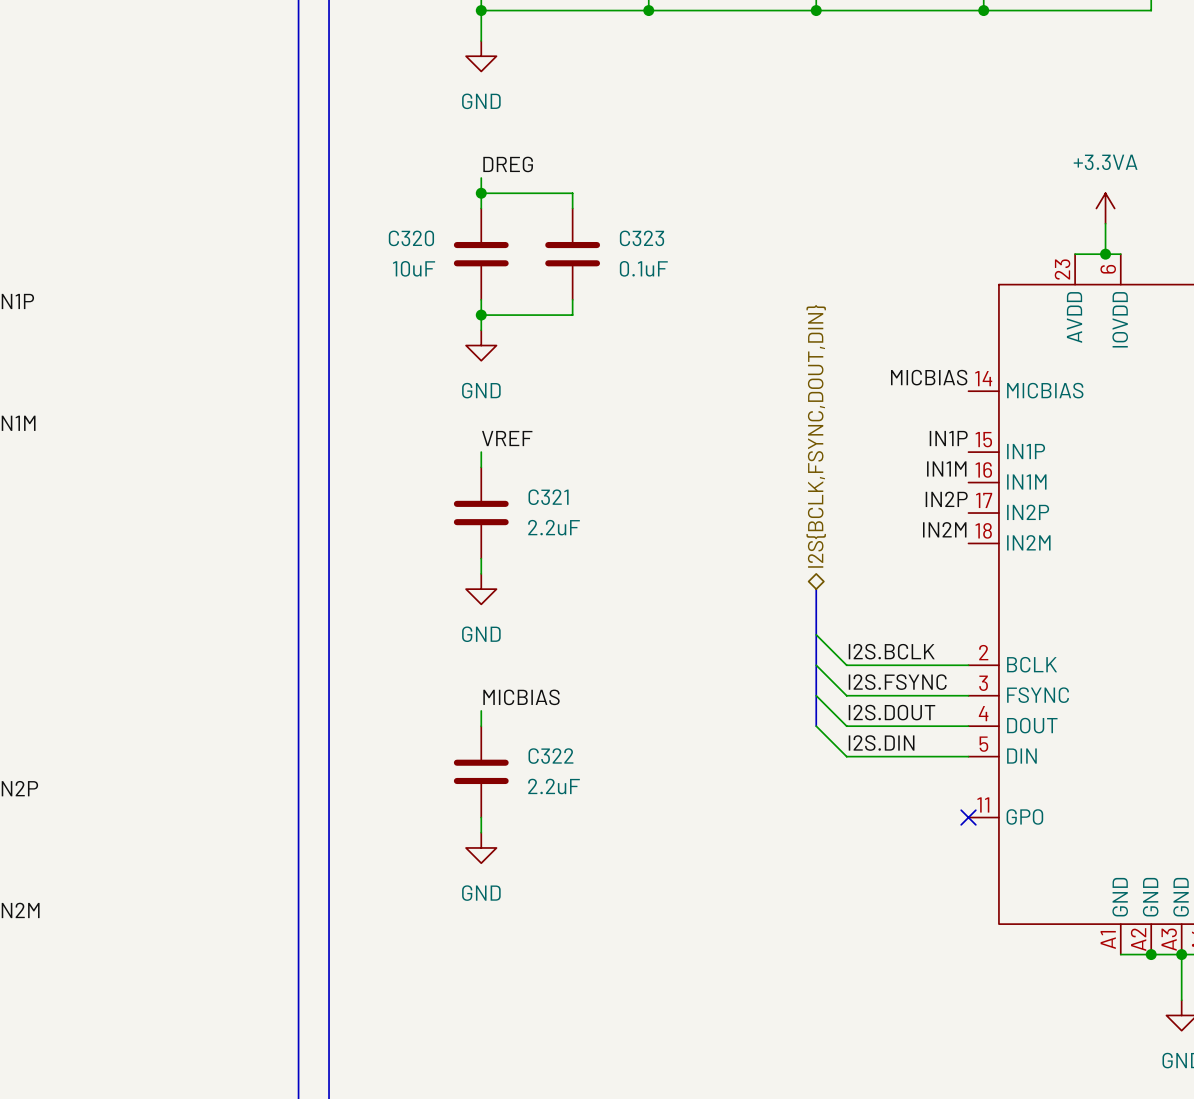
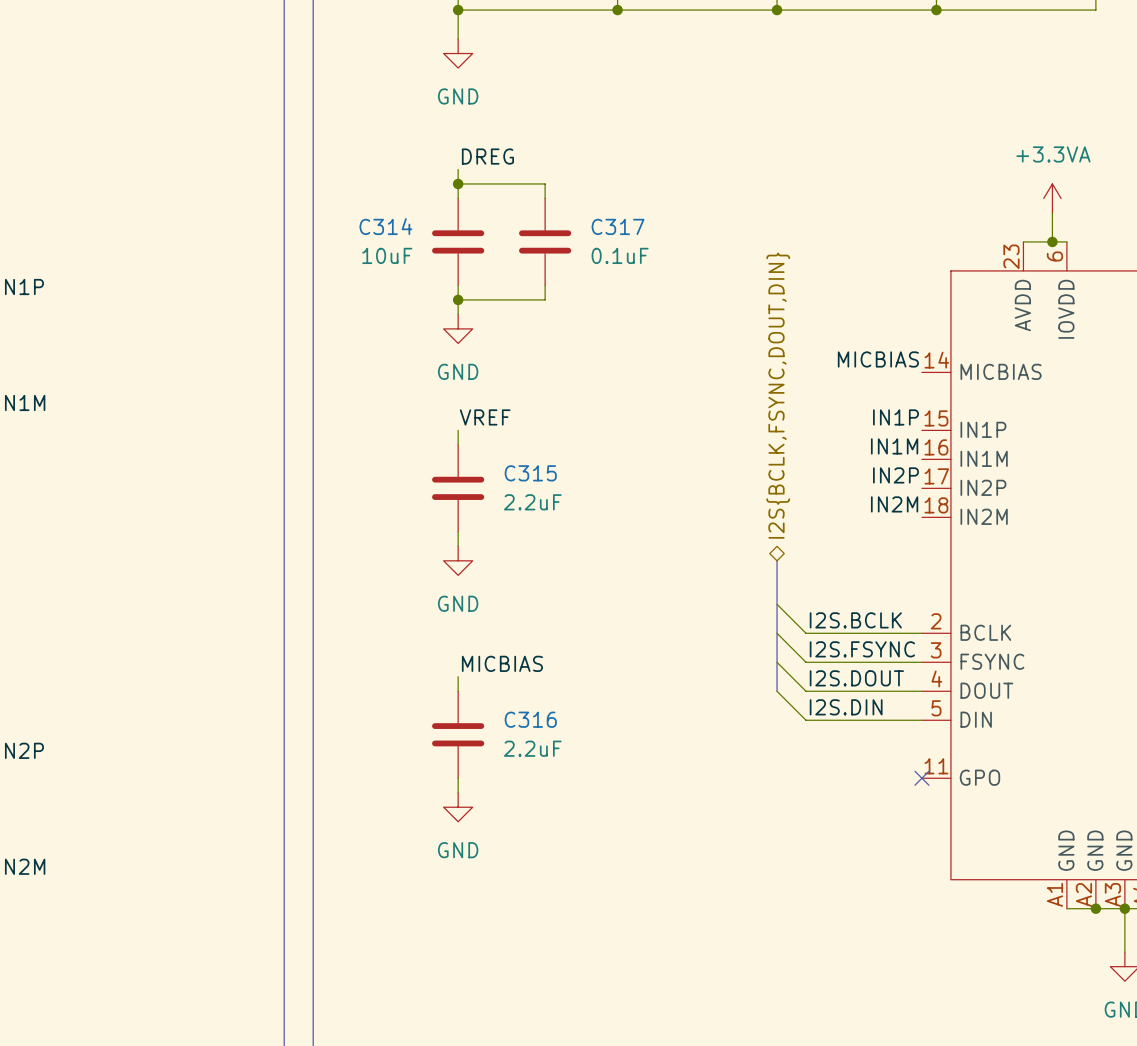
C320 name: C320 (411, 238) -> C314 (385, 226)
C323 name: C323 (642, 238) -> C317 (618, 226)
C321 name: C321 (548, 497) -> C315 (530, 473)
C322 name: C322 (550, 756) -> C316 (530, 719)

